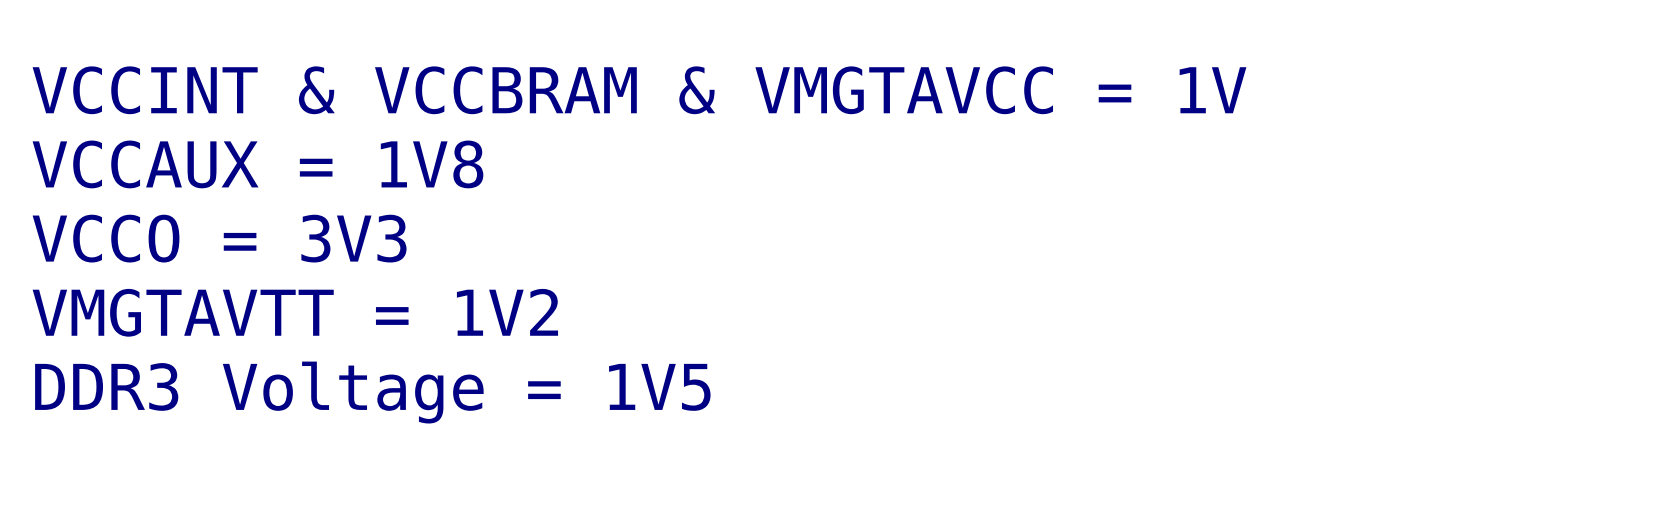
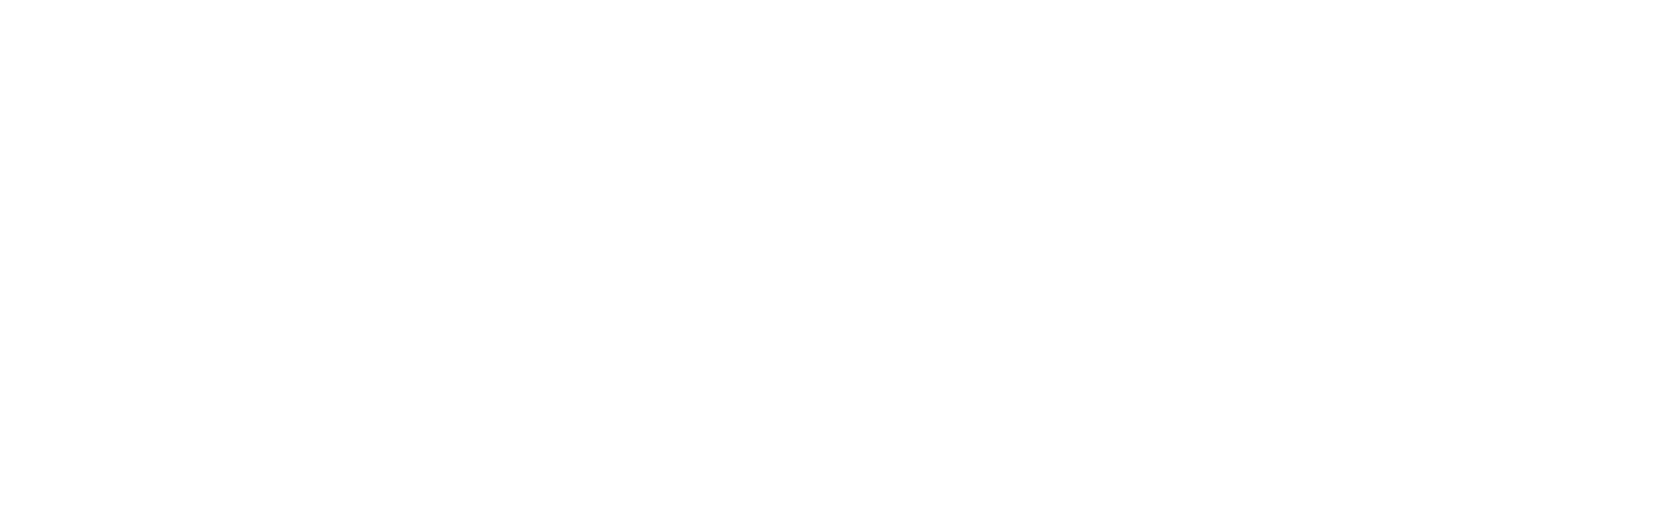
text: VCCINT & VCCBRAM & VMGTAVCC = 1V (639, 90) -> none
text: VCCAUX = 1V8 (257, 164) -> none
text: VCCO = 3V3 (219, 238) -> none
text: VMGTAVTT = 1V2 (295, 312) -> none
text: DDR3 Voltage = 1V5 (372, 392) -> none

